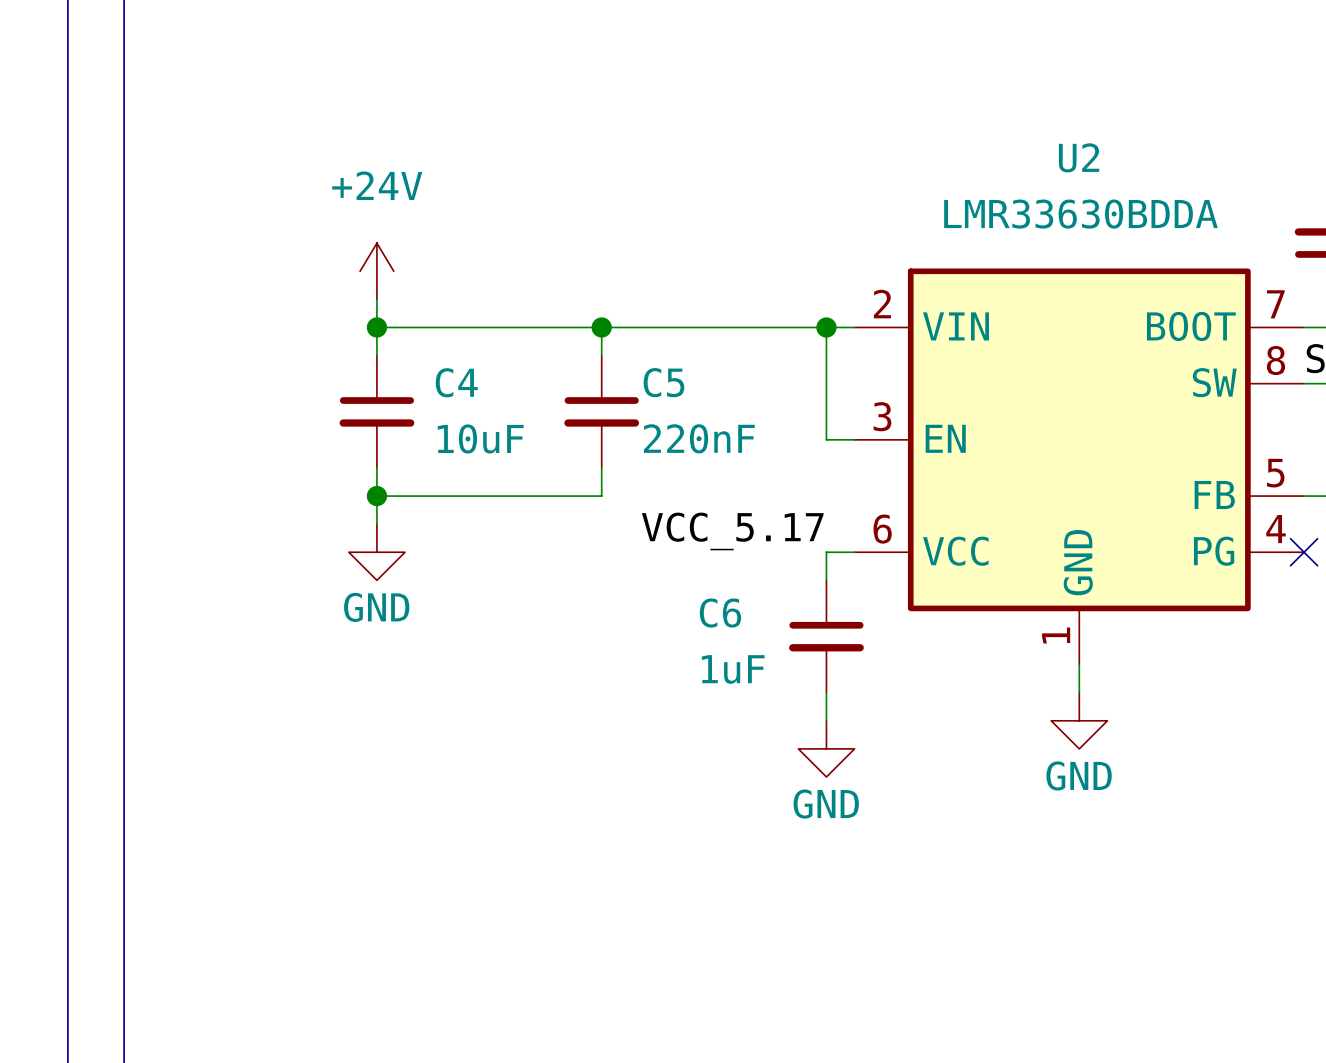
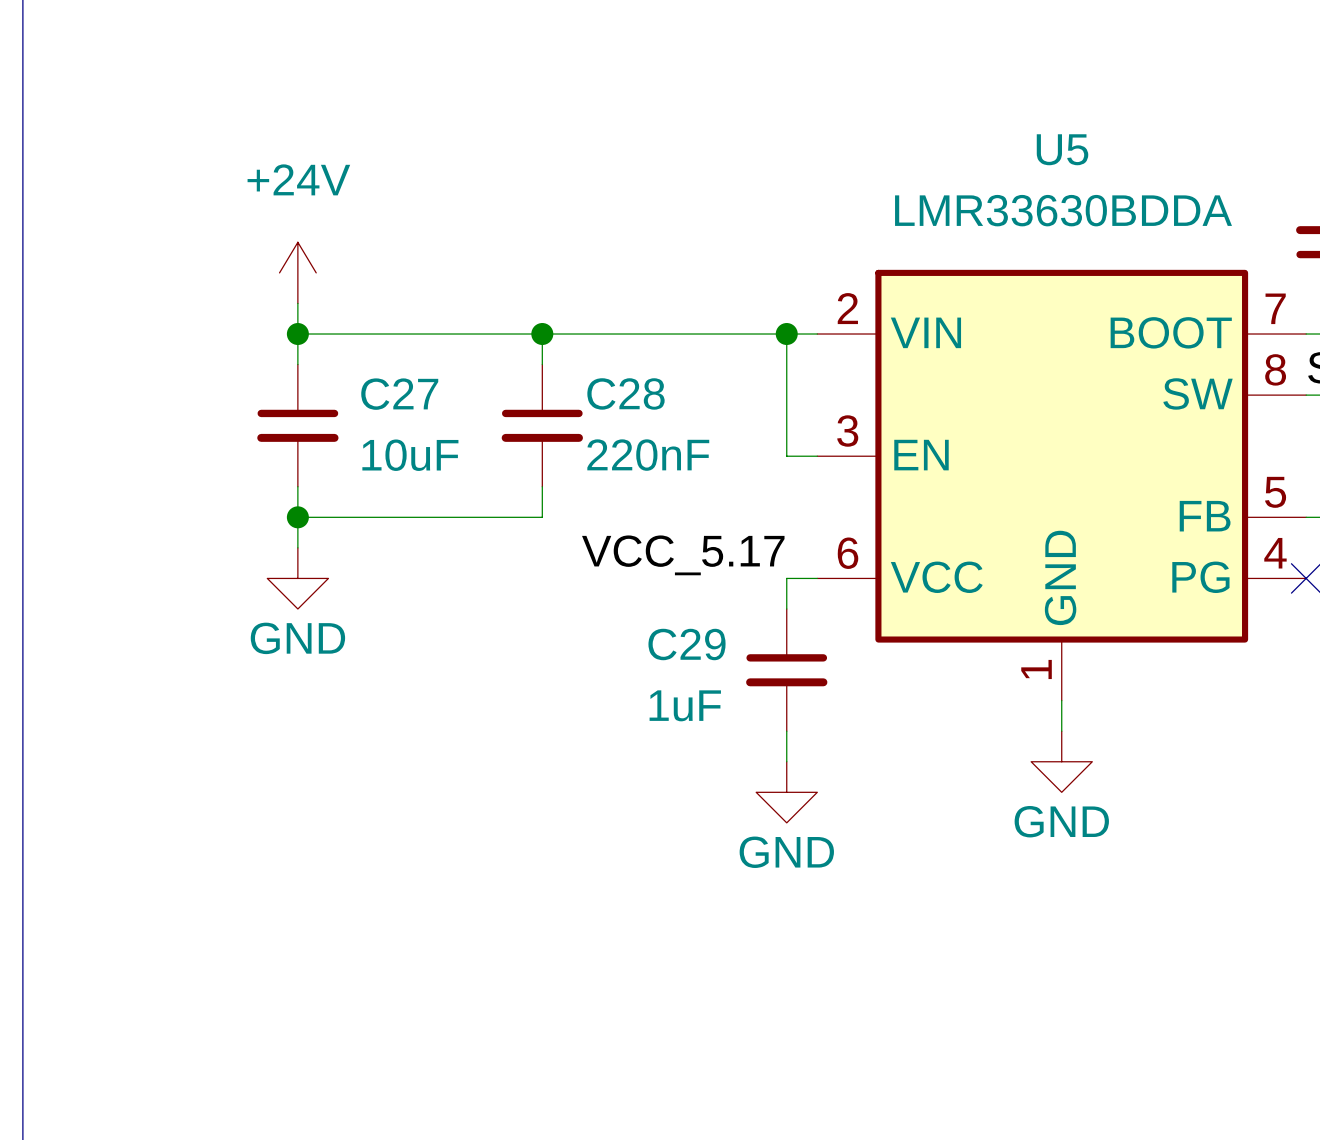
U2 name: U2 (1079, 157) -> U5 (1062, 149)
C4 name: C4 (456, 382) -> C27 (399, 394)
C5 name: C5 (664, 382) -> C28 (625, 393)
C6 name: C6 (720, 613) -> C29 (687, 644)

